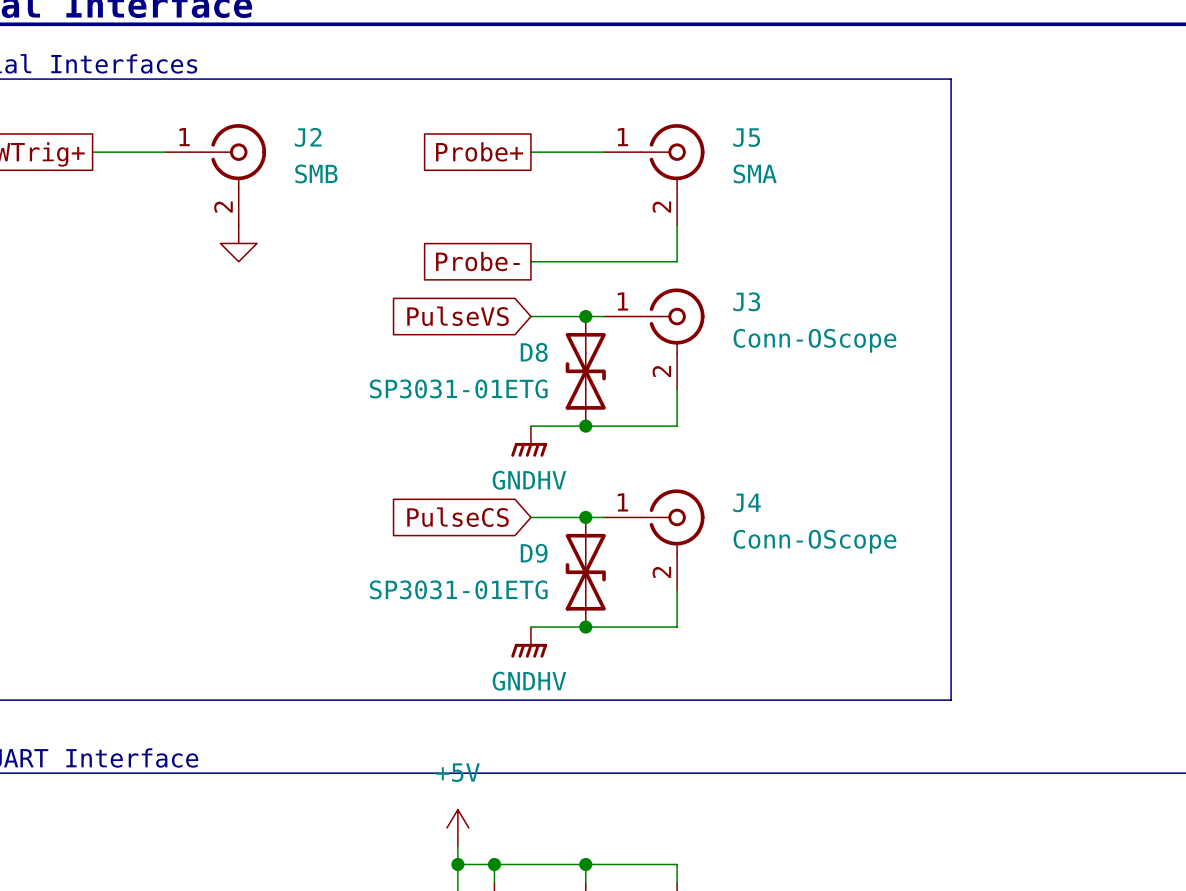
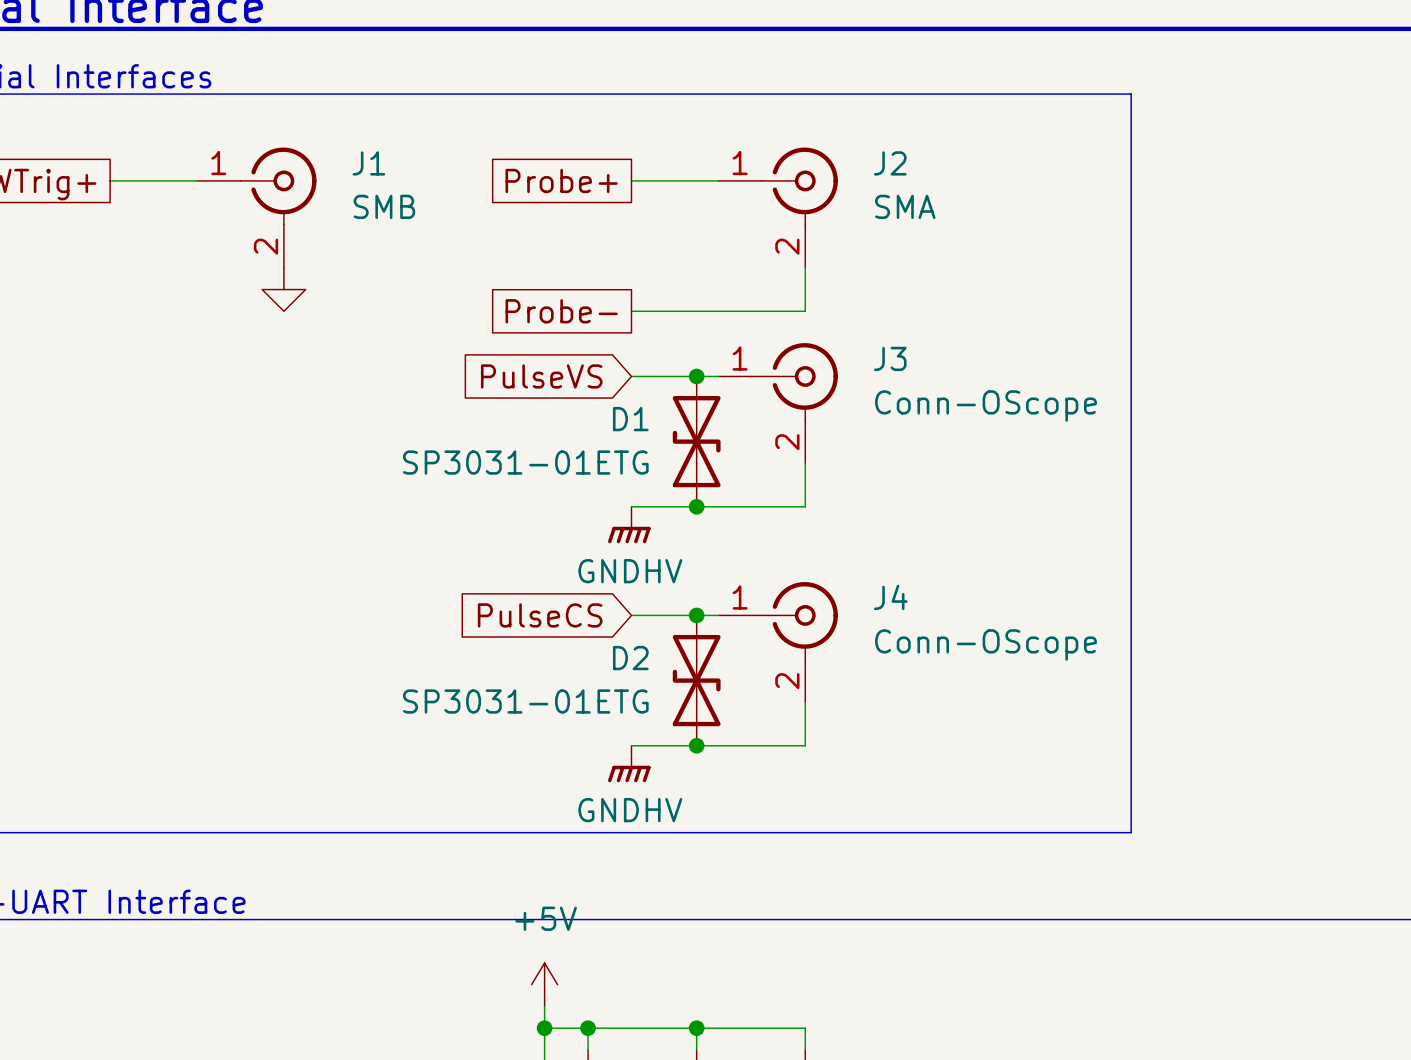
J2 name: J2 (308, 137) -> J1 (368, 163)
J5 name: J5 (746, 137) -> J2 (890, 163)
D8 name: D8 (534, 352) -> D1 (630, 419)
D9 name: D9 (534, 553) -> D2 (630, 658)

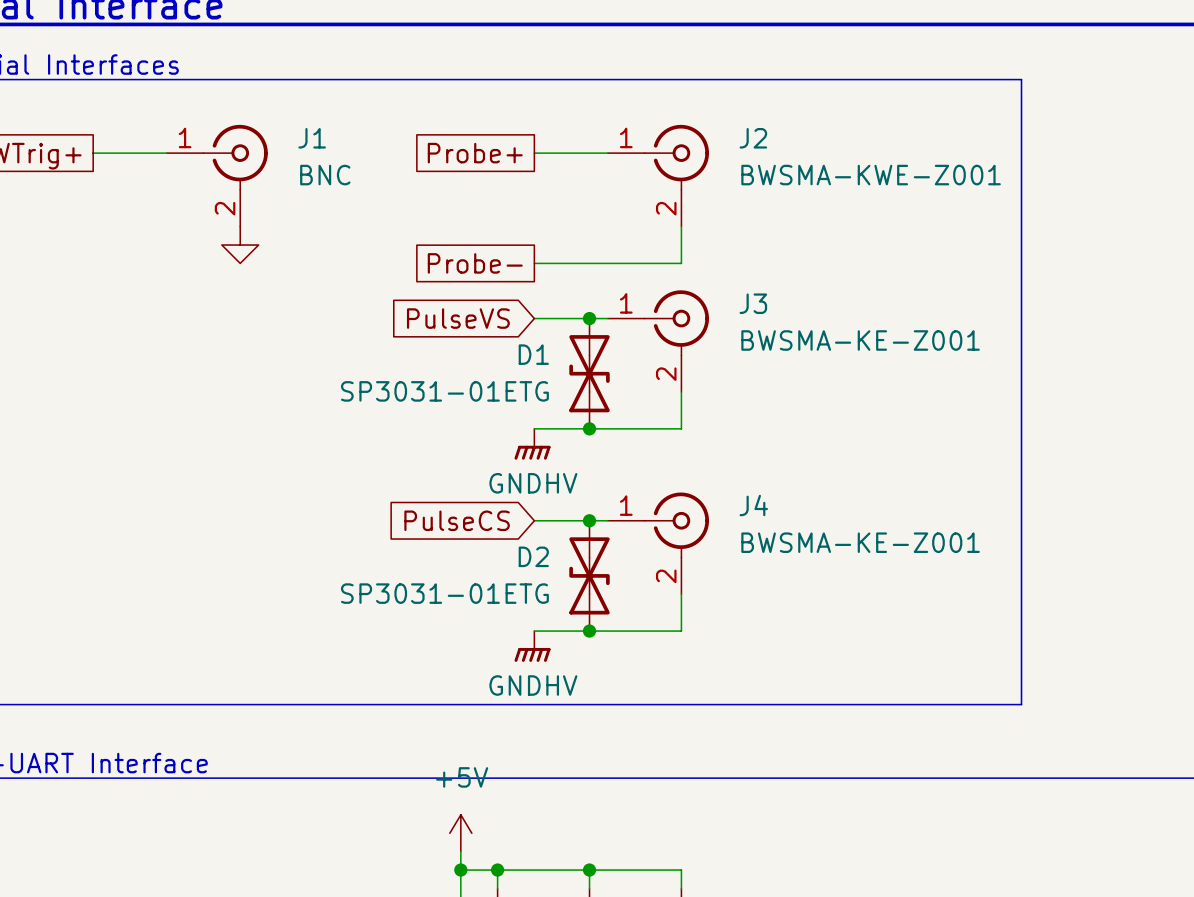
line: (1131, 94) (1131, 832) -> (957, 79) (1021, 79) (1021, 704) (957, 704)
J1 value: SMB (384, 206) -> BNC (325, 175)
J2 value: SMA (905, 206) -> BWSMA-KWE-Z001 (871, 175)
J3 value: Conn-OScope (985, 406) -> BWSMA-KE-Z001 (860, 340)
J4 value: Conn-OScope (985, 644) -> BWSMA-KE-Z001 (860, 542)

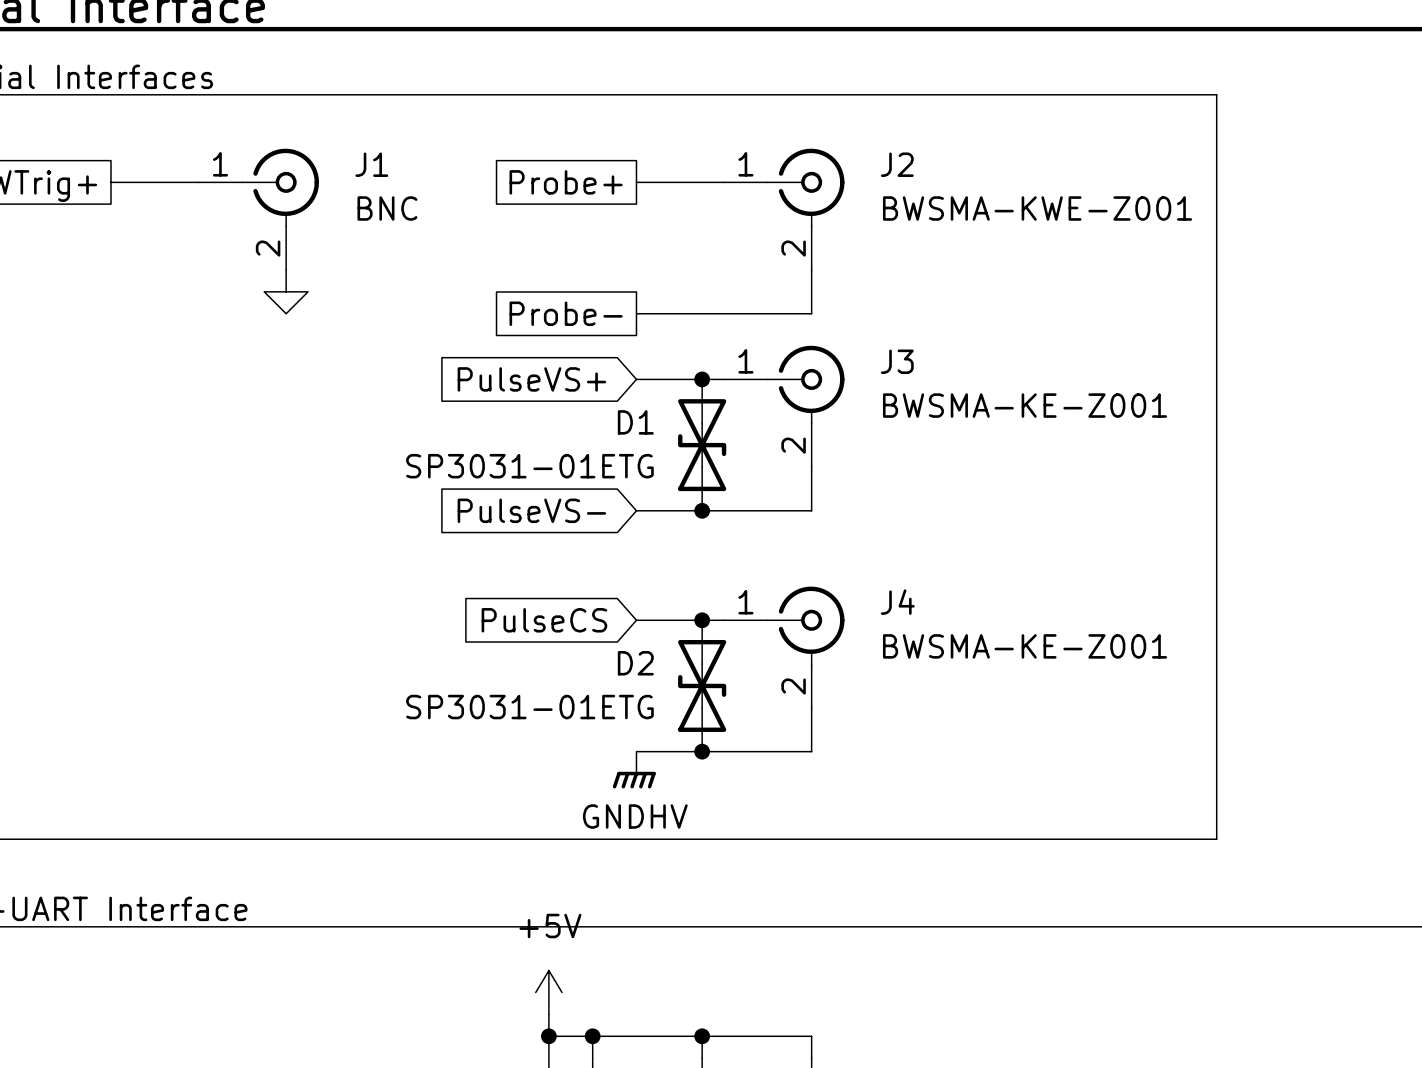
global label: PulseVS (458, 318) -> PulseVS+ (531, 379)
global label: none -> PulseVS- (531, 510)
power symbol: GNDHV (532, 444) -> none

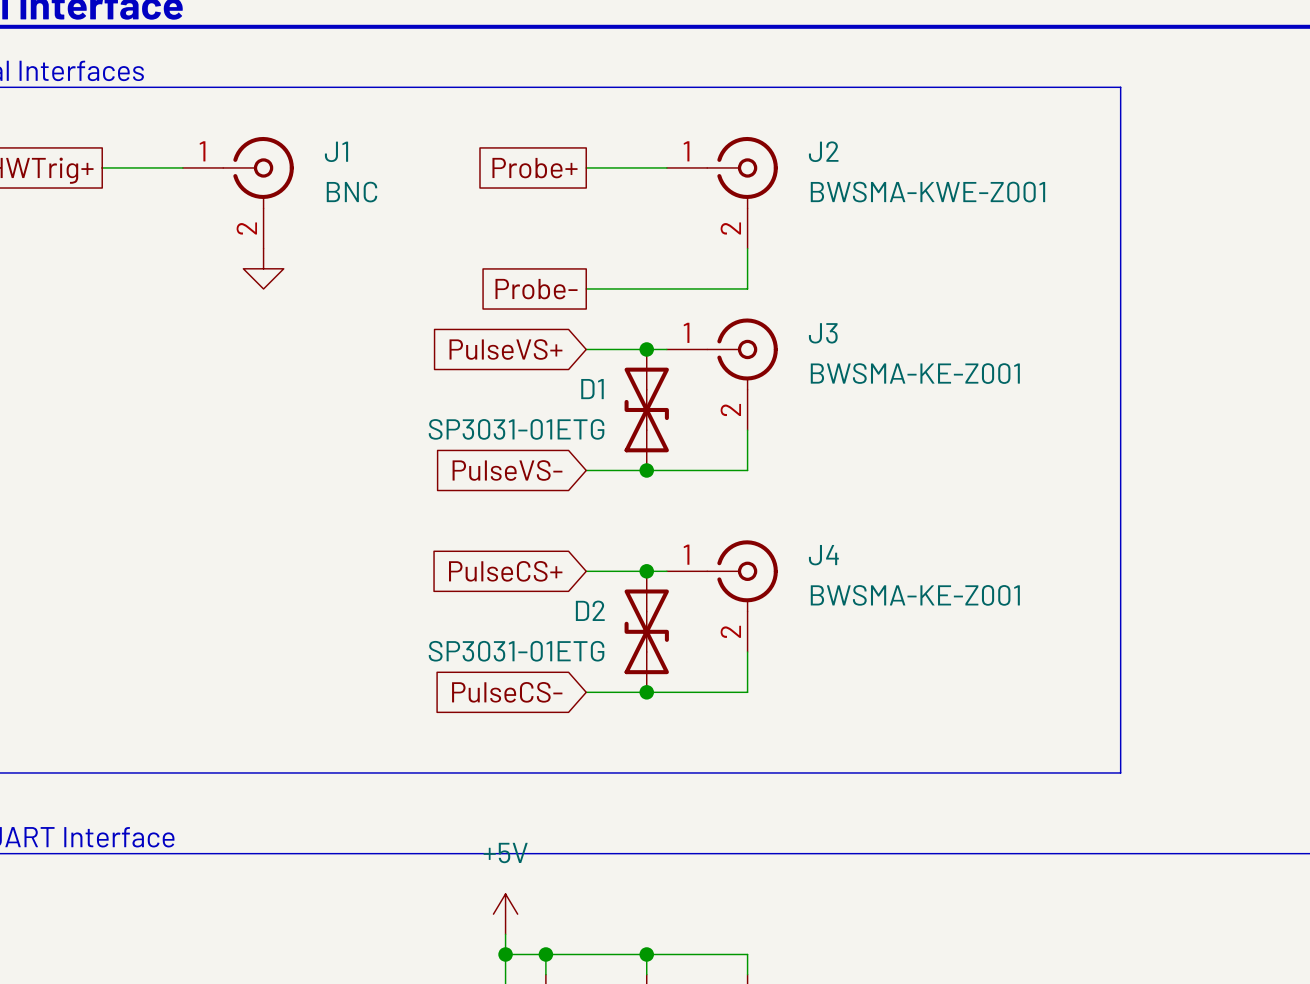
global label: PulseCS (544, 620) -> PulseCS+ (505, 571)
global label: none -> PulseCS- (507, 692)
power symbol: GNDHV (634, 770) -> none

